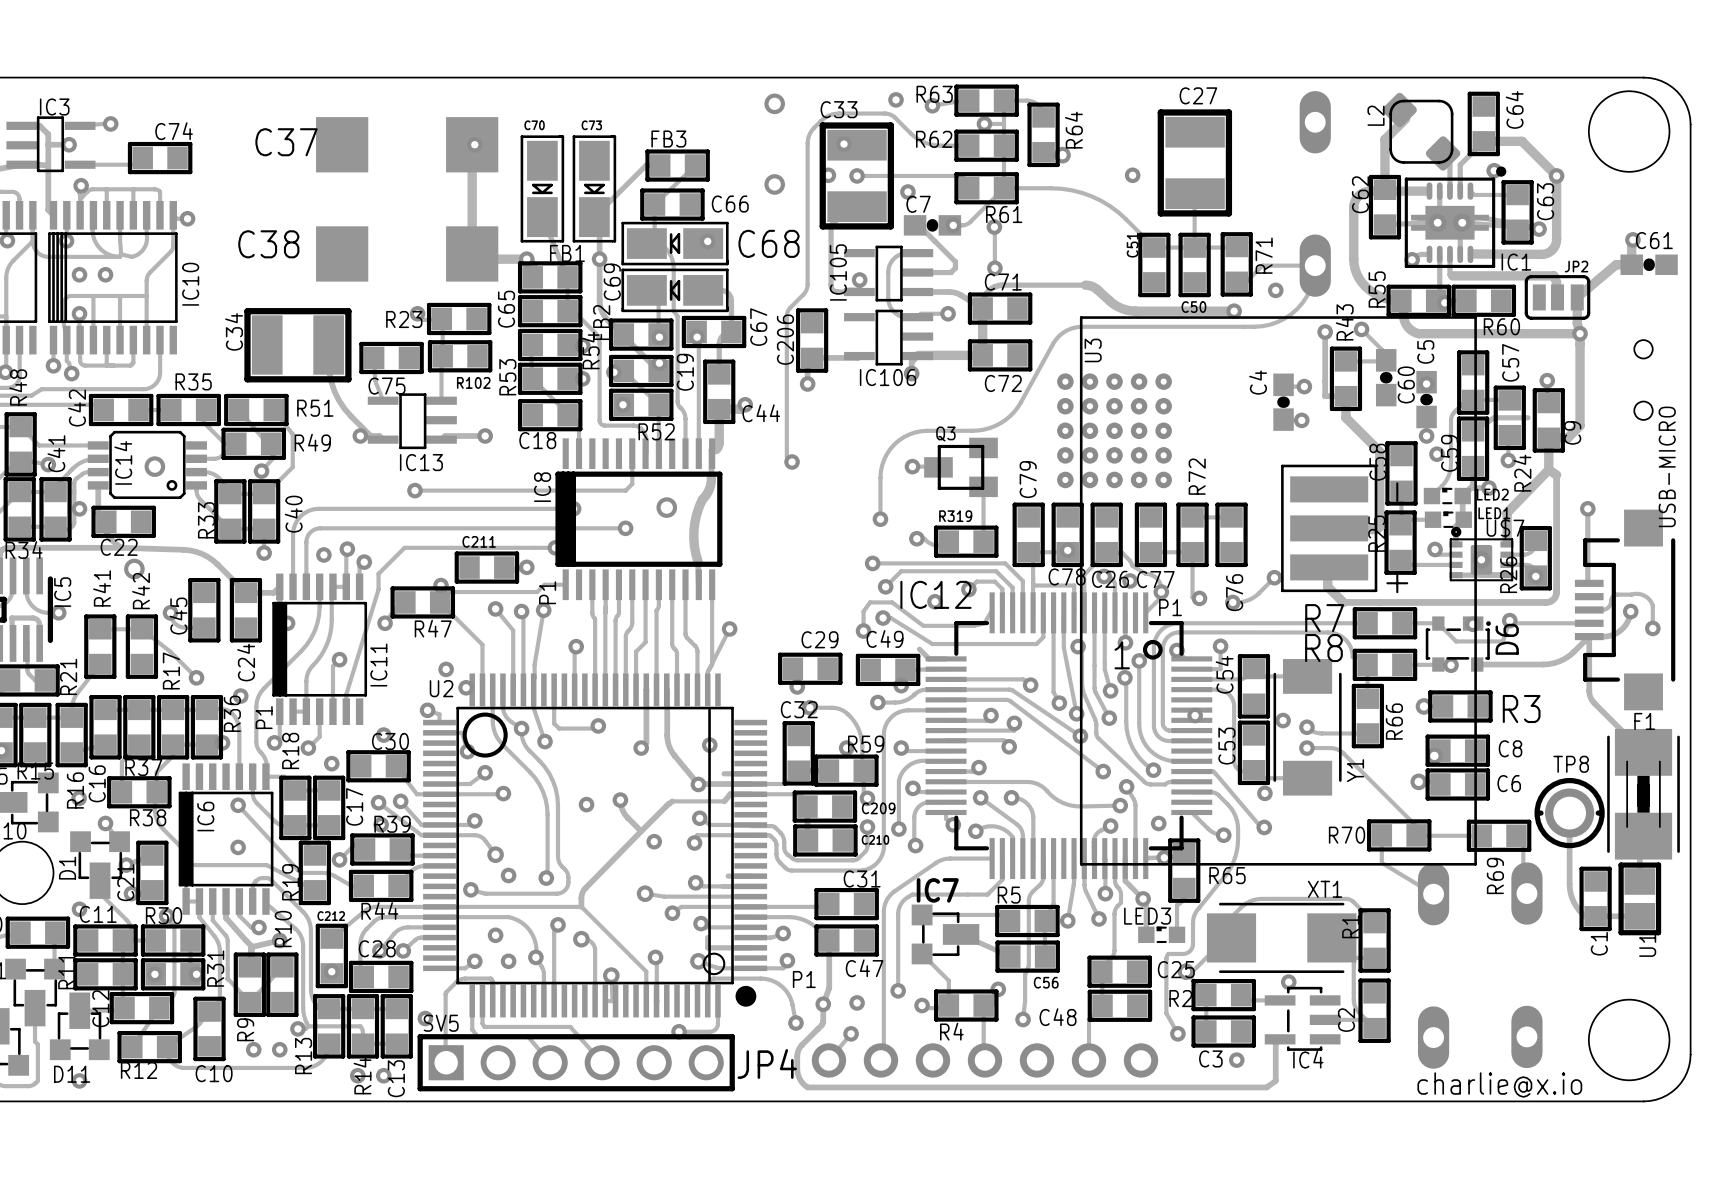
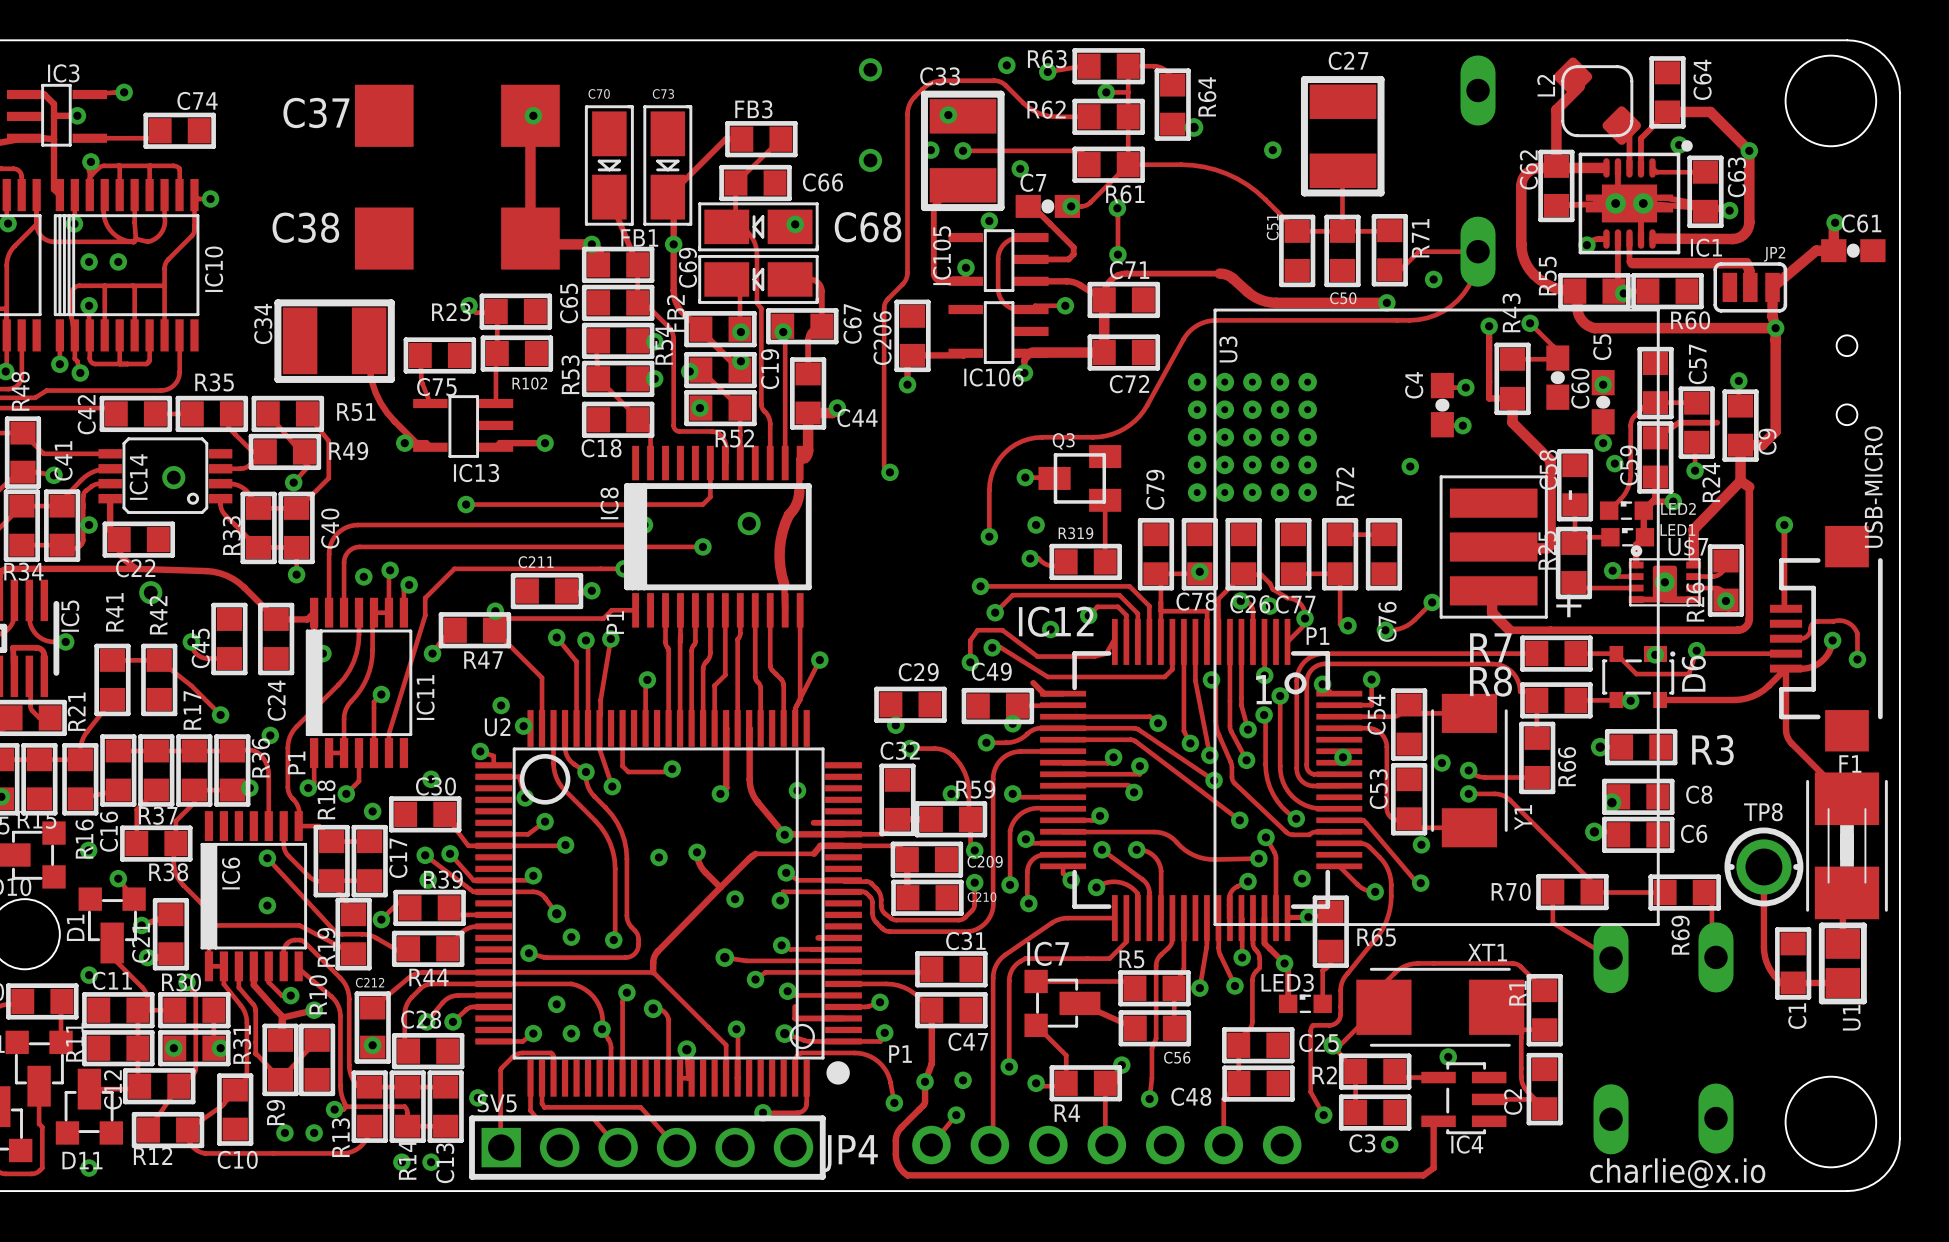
via: none -> (989, 221)
via: none -> (1410, 466)
via: none -> (1036, 525)

